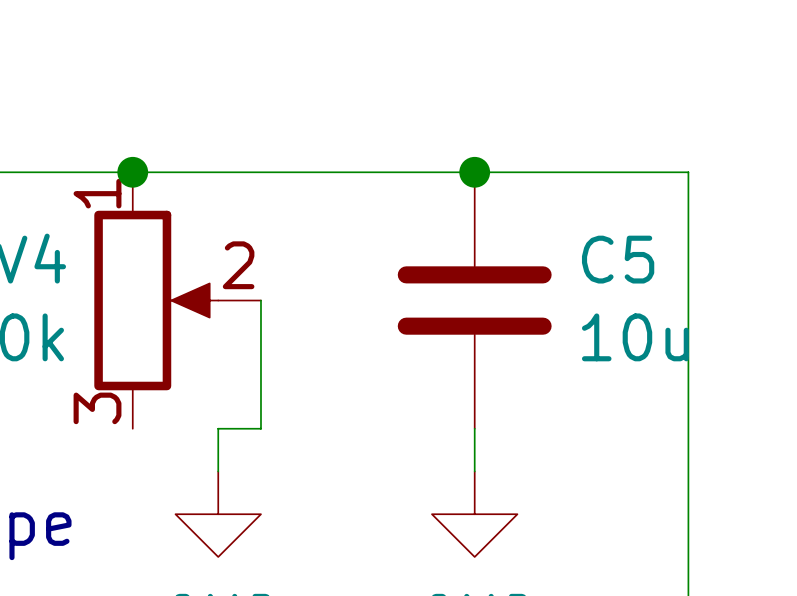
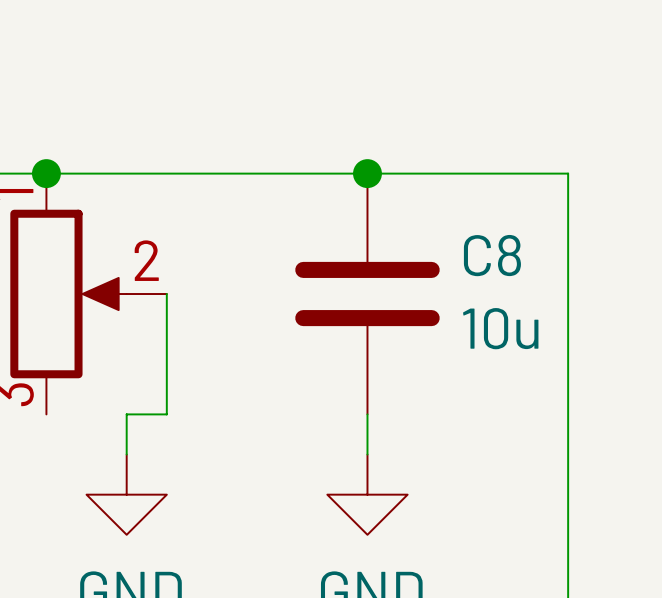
C5 name: C5 (618, 259) -> C8 (492, 255)

